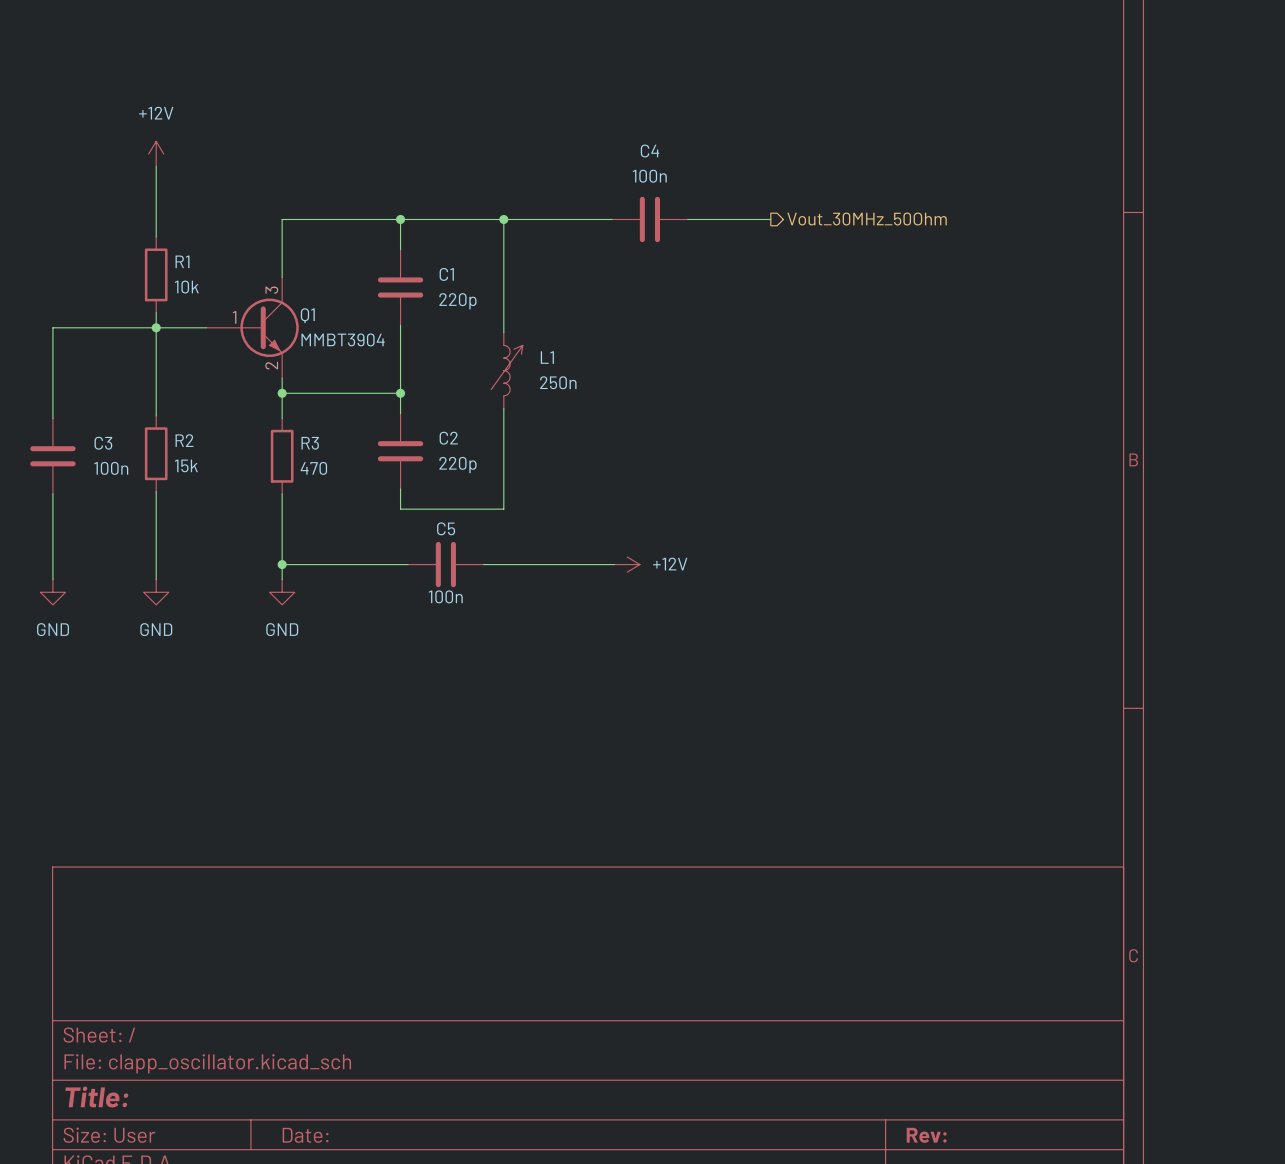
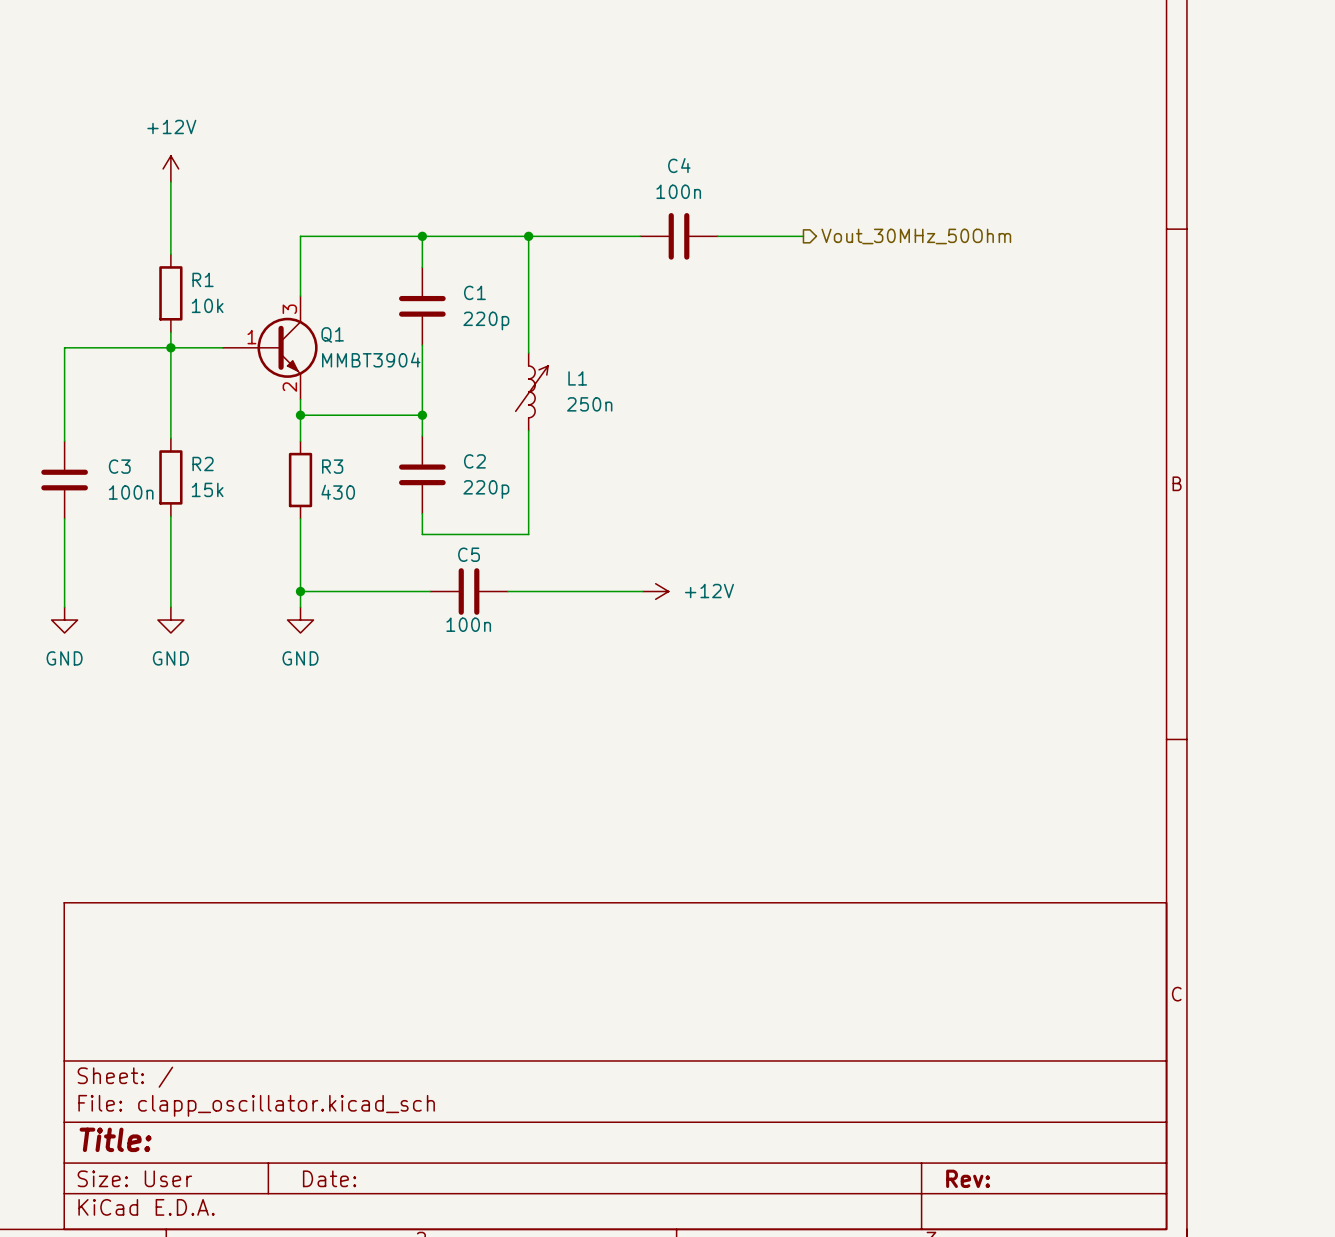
R3 value: 470 (313, 468) -> 430 (338, 492)

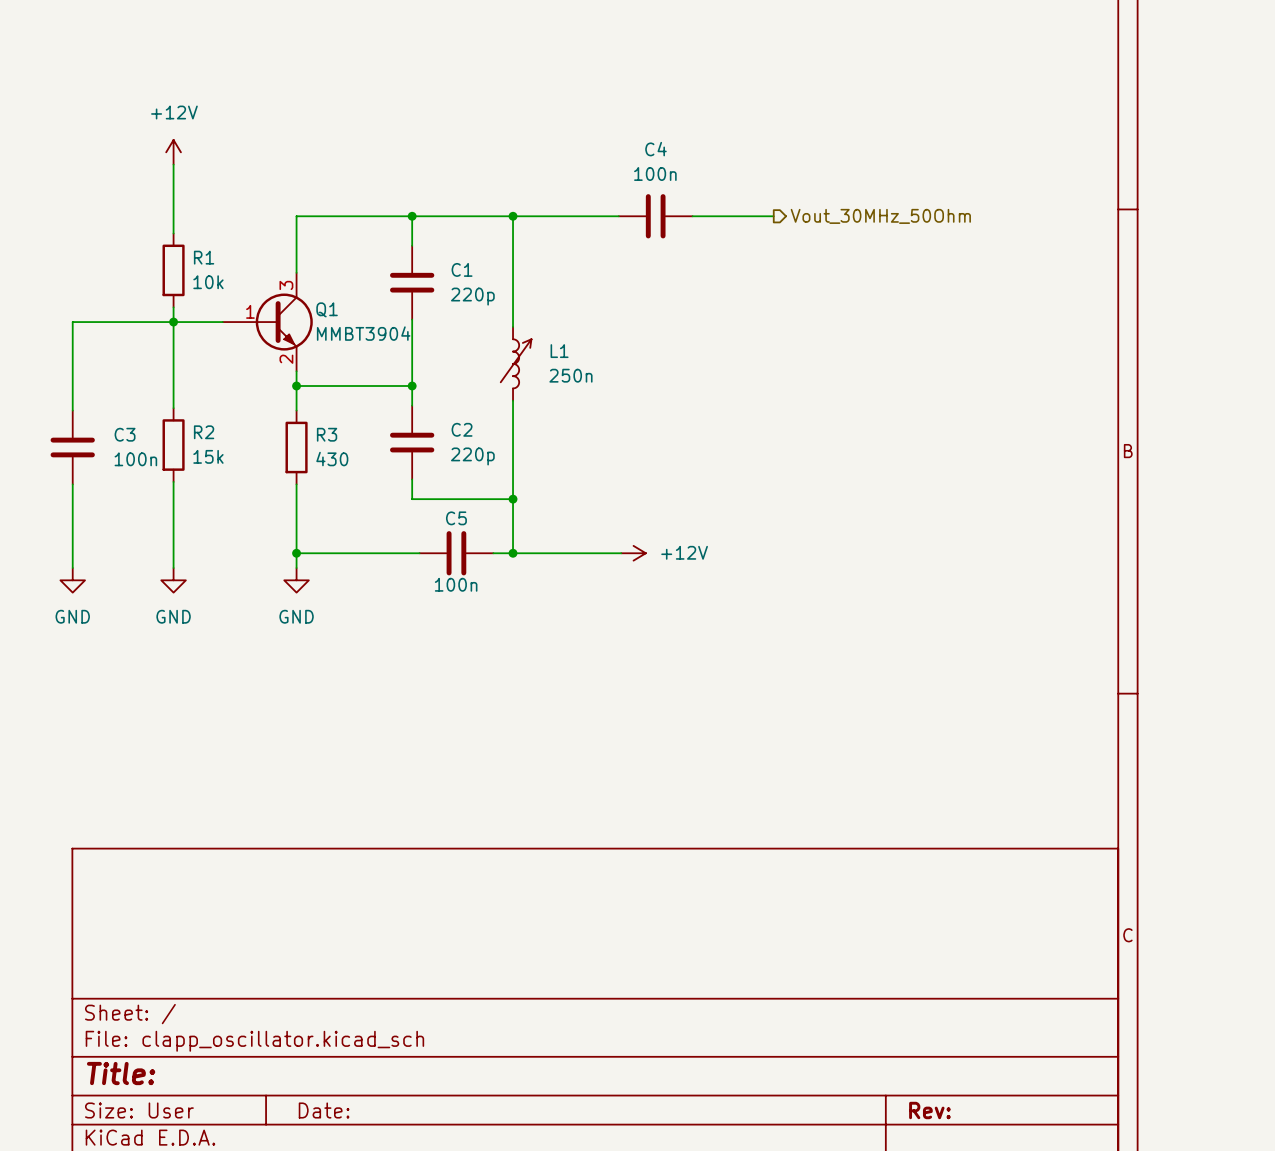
wire: none -> (513, 499) (513, 553)
junction: none -> (513, 499)
junction: none -> (513, 553)

